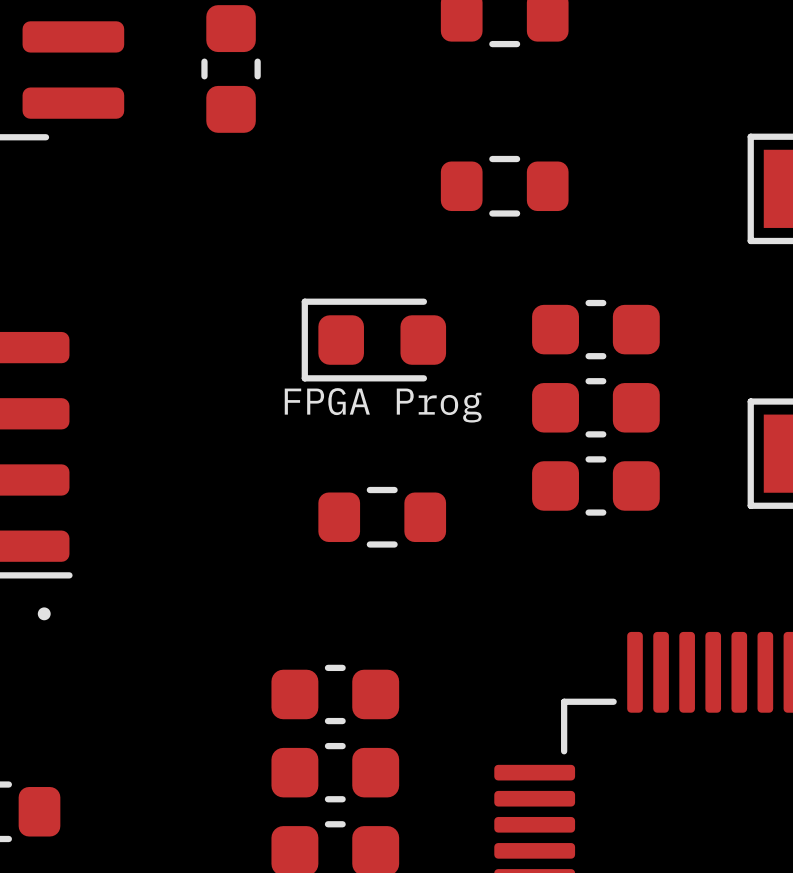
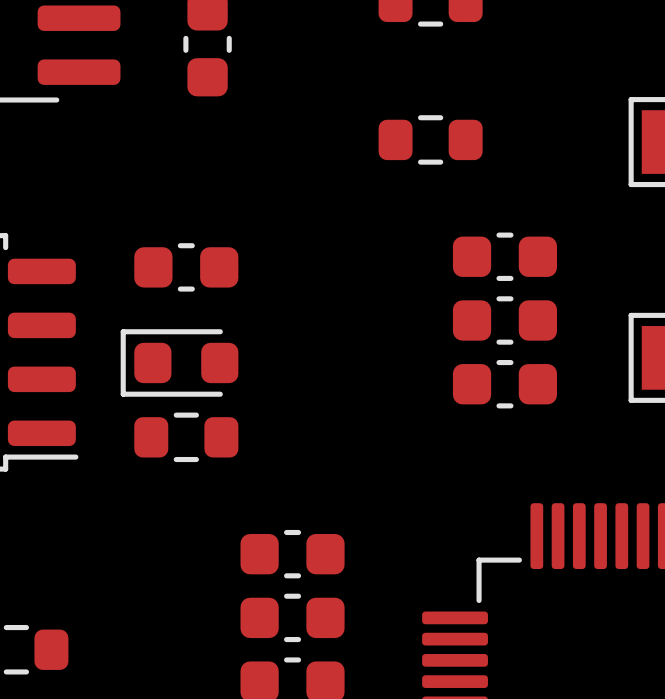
part position: (373, 340) -> (179, 362)
part: none -> (186, 267)
text: FPGA Prog (383, 405) -> none
part position: (382, 517) -> (186, 437)
drawing: [37, 607, 51, 621] -> none

